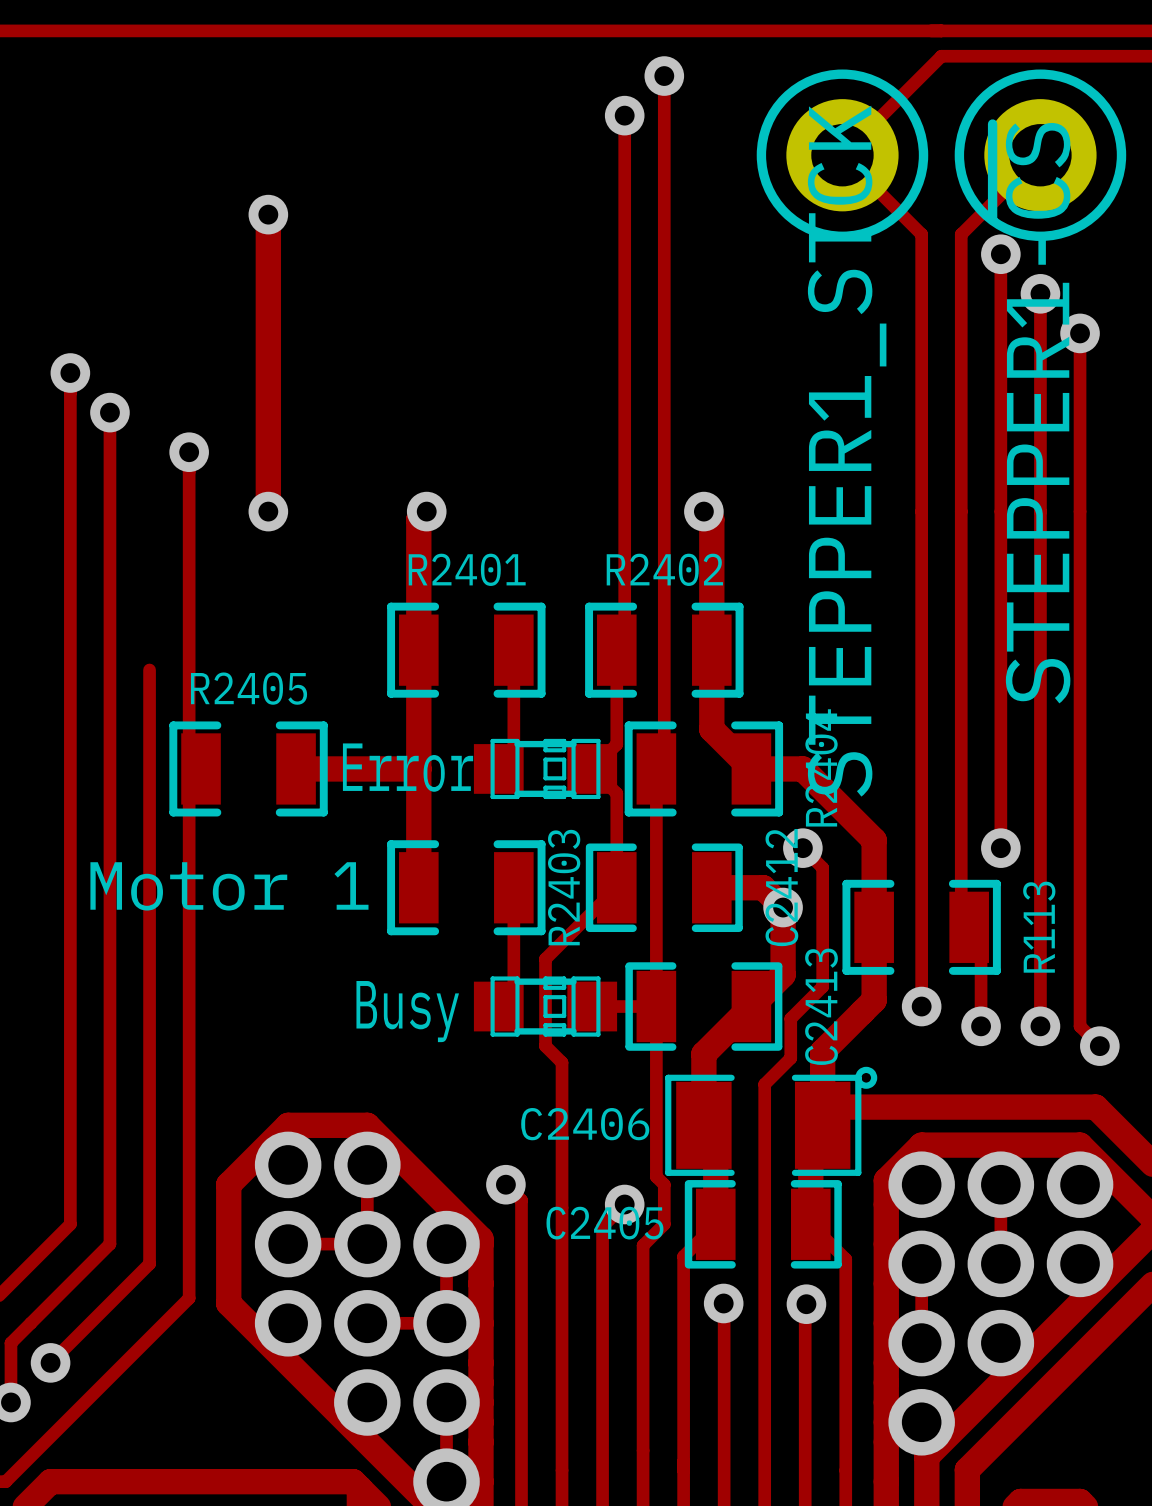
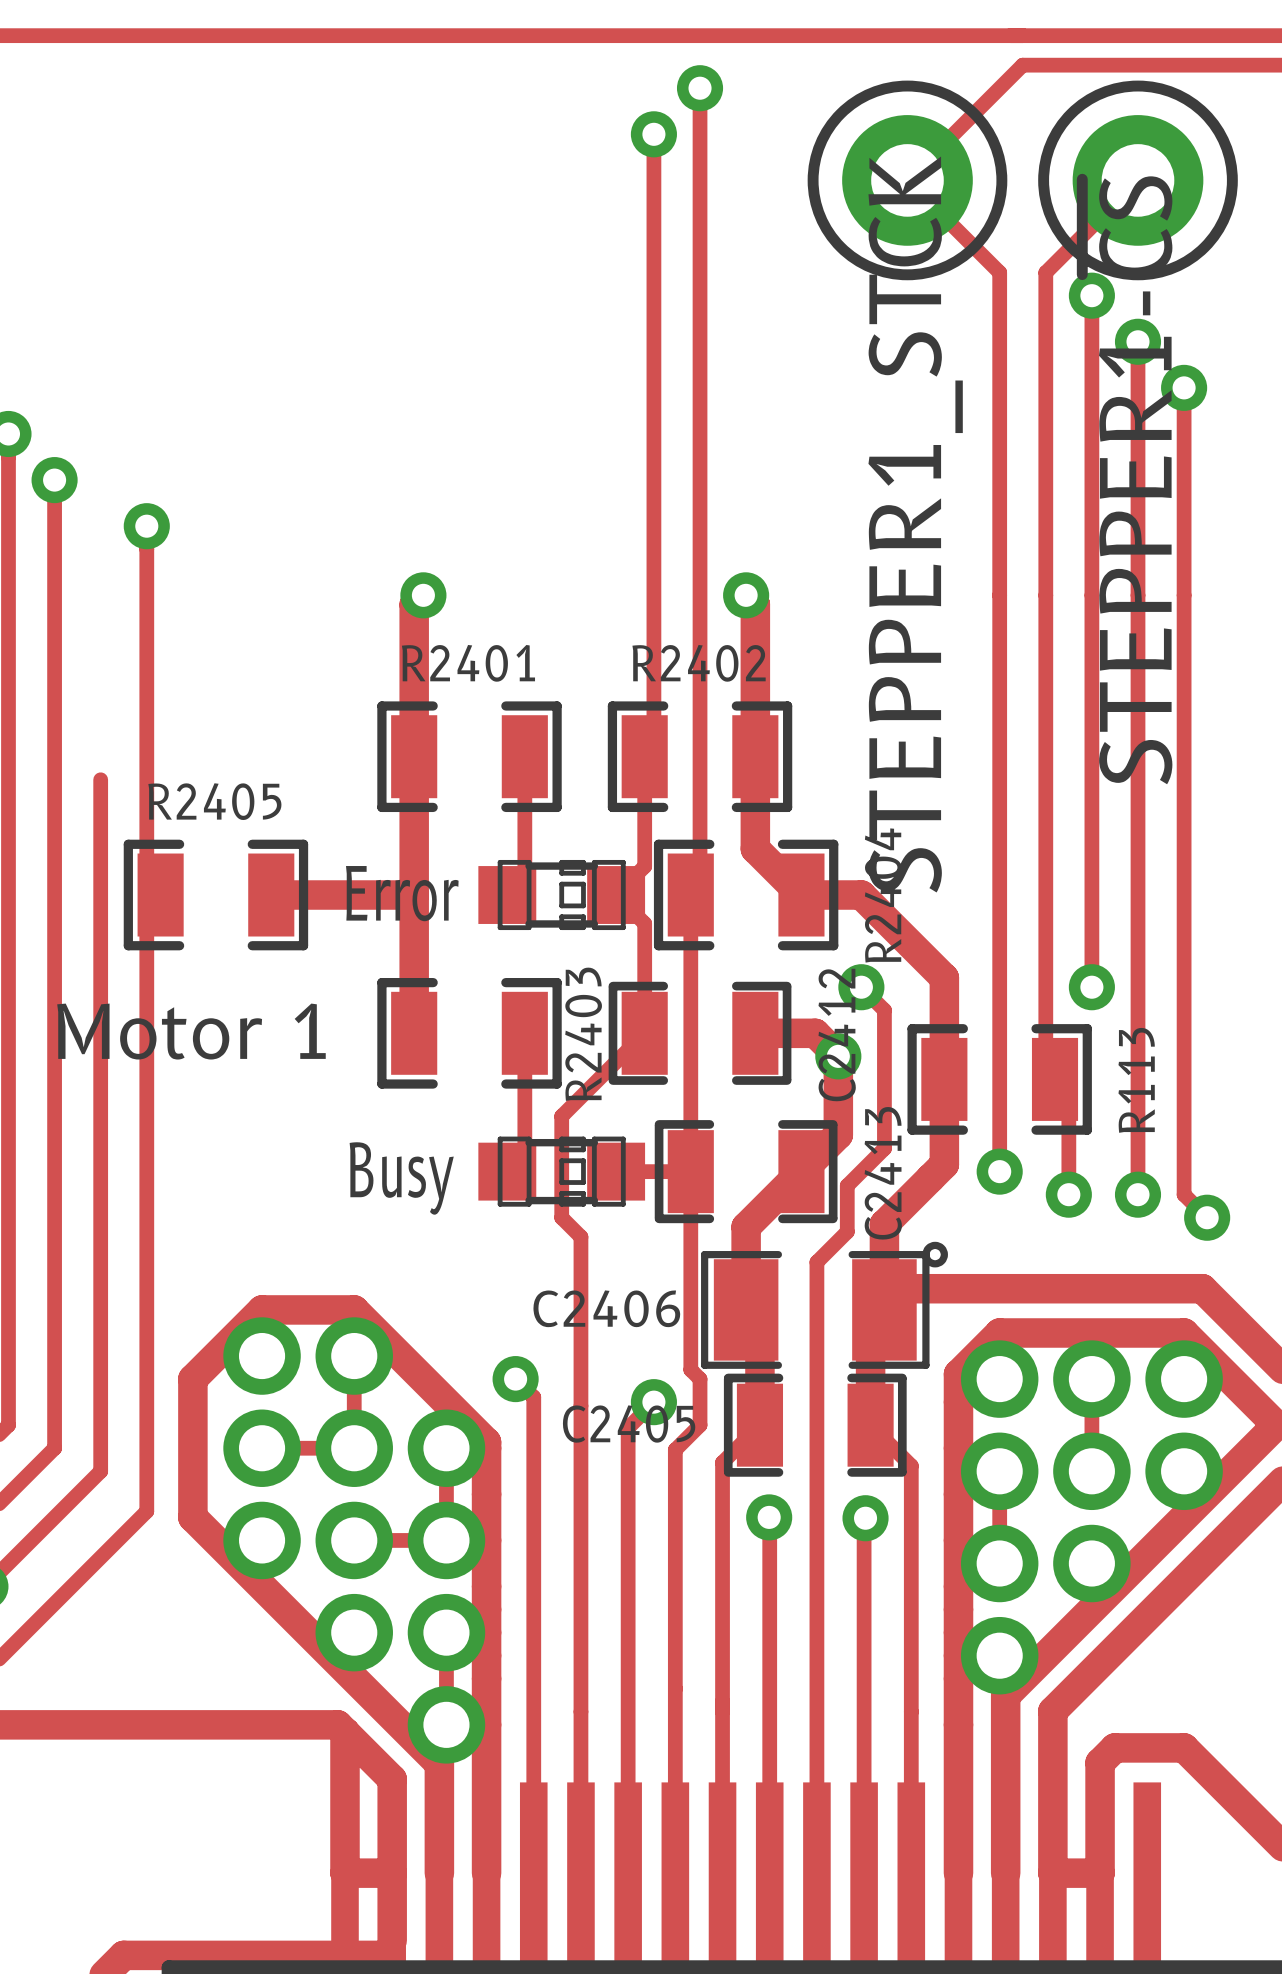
track: (268, 214) (268, 511) -> none
via: (268, 214) -> none
via: (268, 511) -> none

